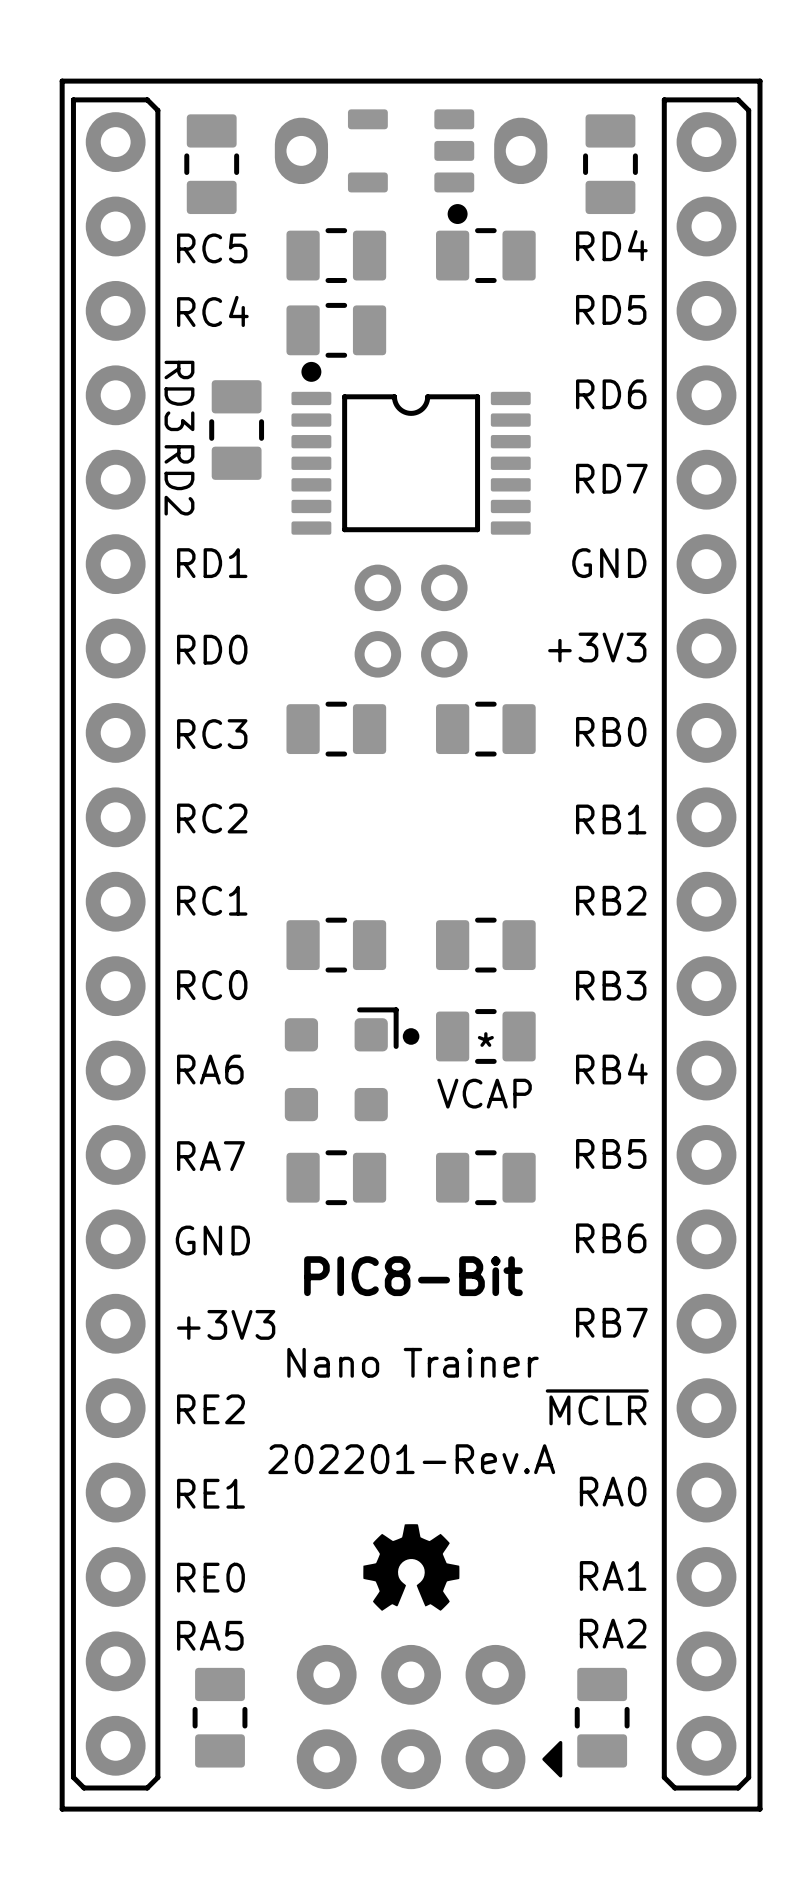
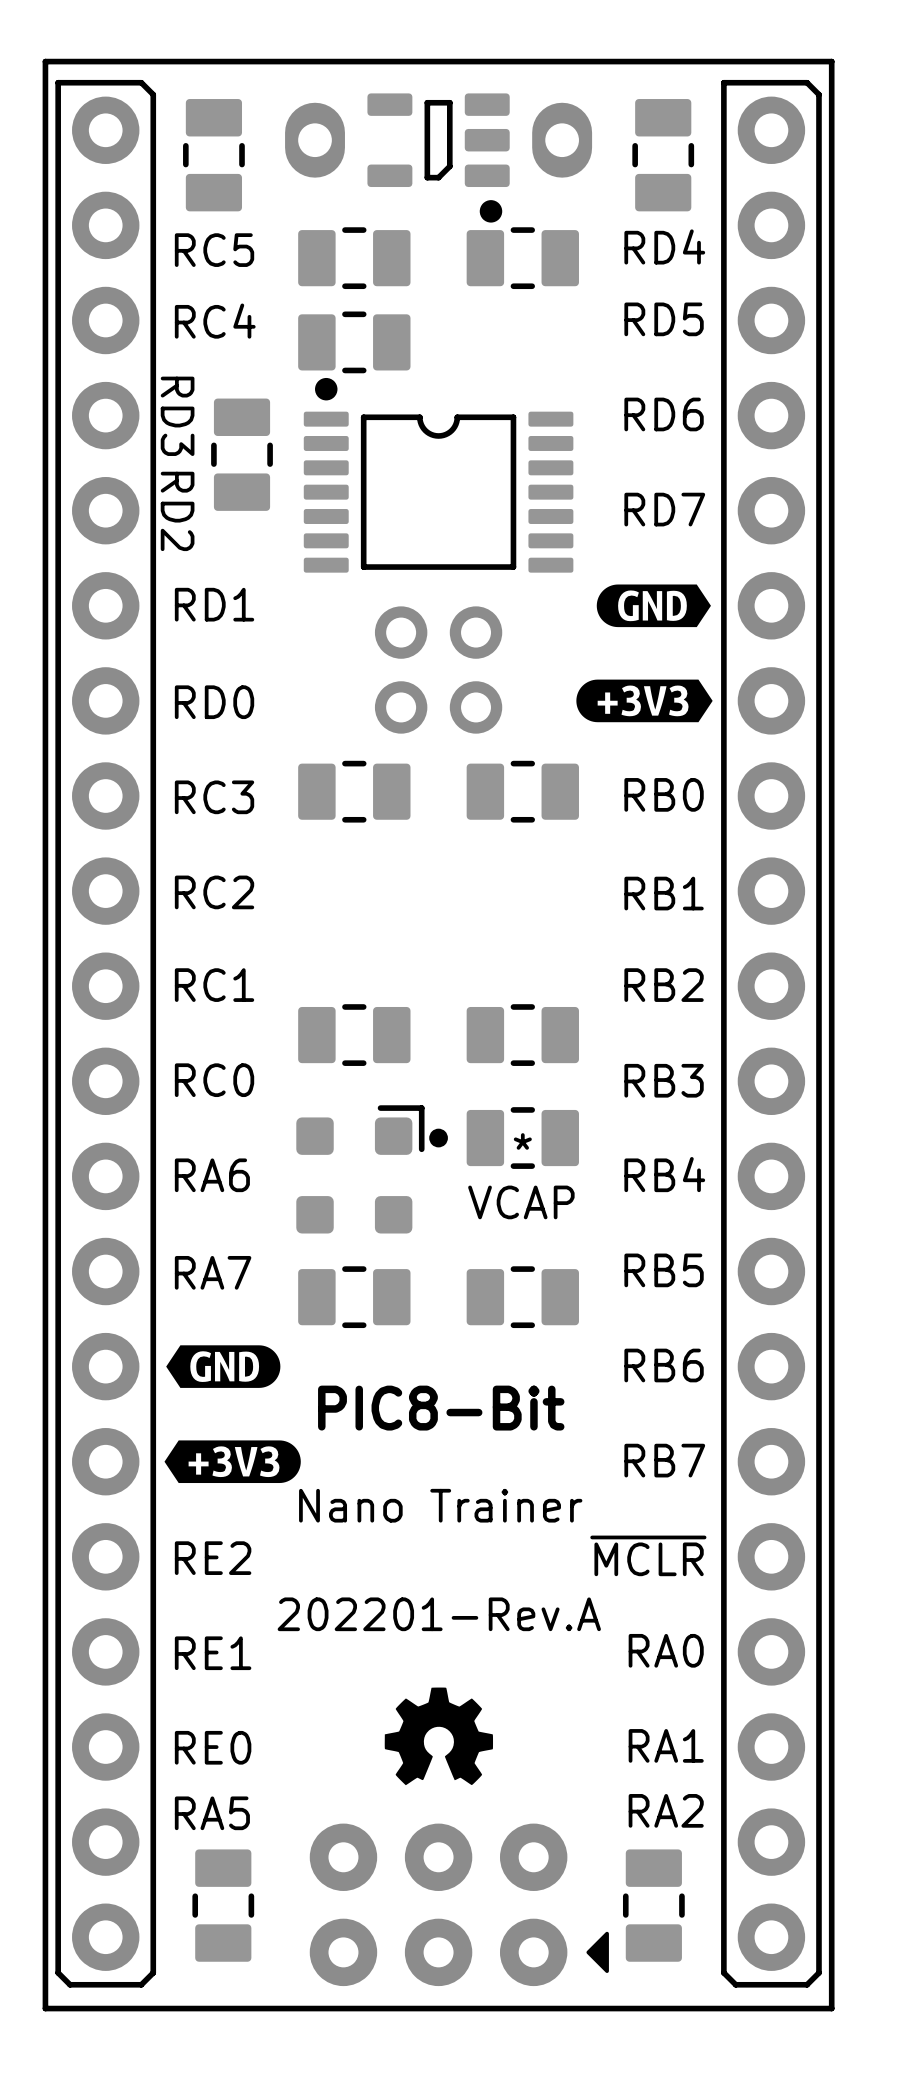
part footprint: [347, 109, 475, 193] -> [367, 93, 510, 188]
drawing: none -> [596, 584, 711, 628]
text: GND (609, 563) -> none
drawing: none -> [576, 679, 713, 723]
text: +3V3 (597, 647) -> none
drawing: none -> [166, 1345, 281, 1388]
text: GND (212, 1240) -> none
drawing: none -> [164, 1440, 301, 1484]
text: +3V3 (226, 1324) -> none

